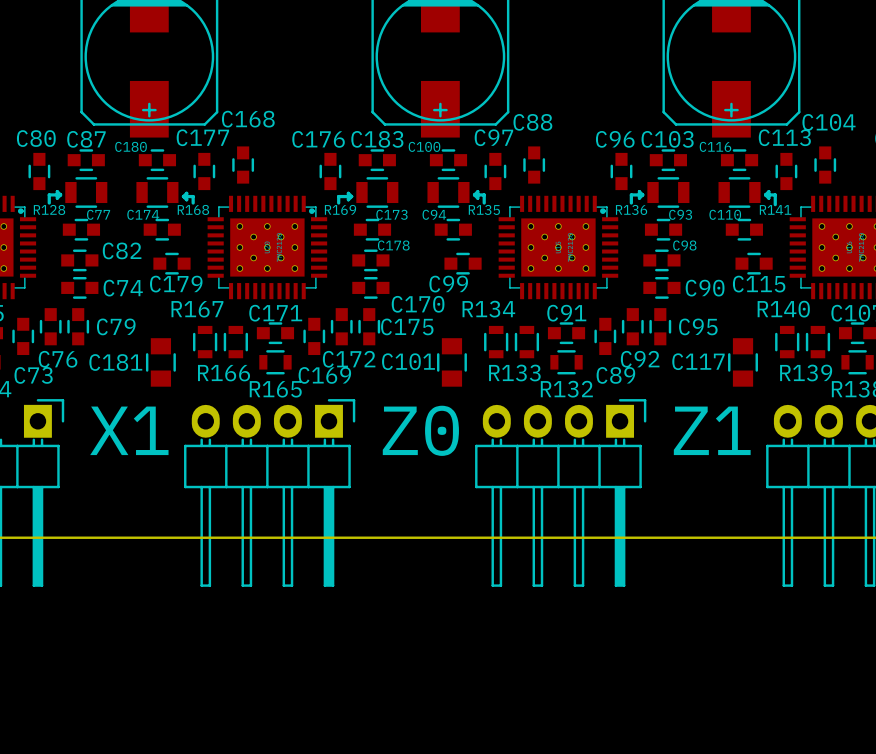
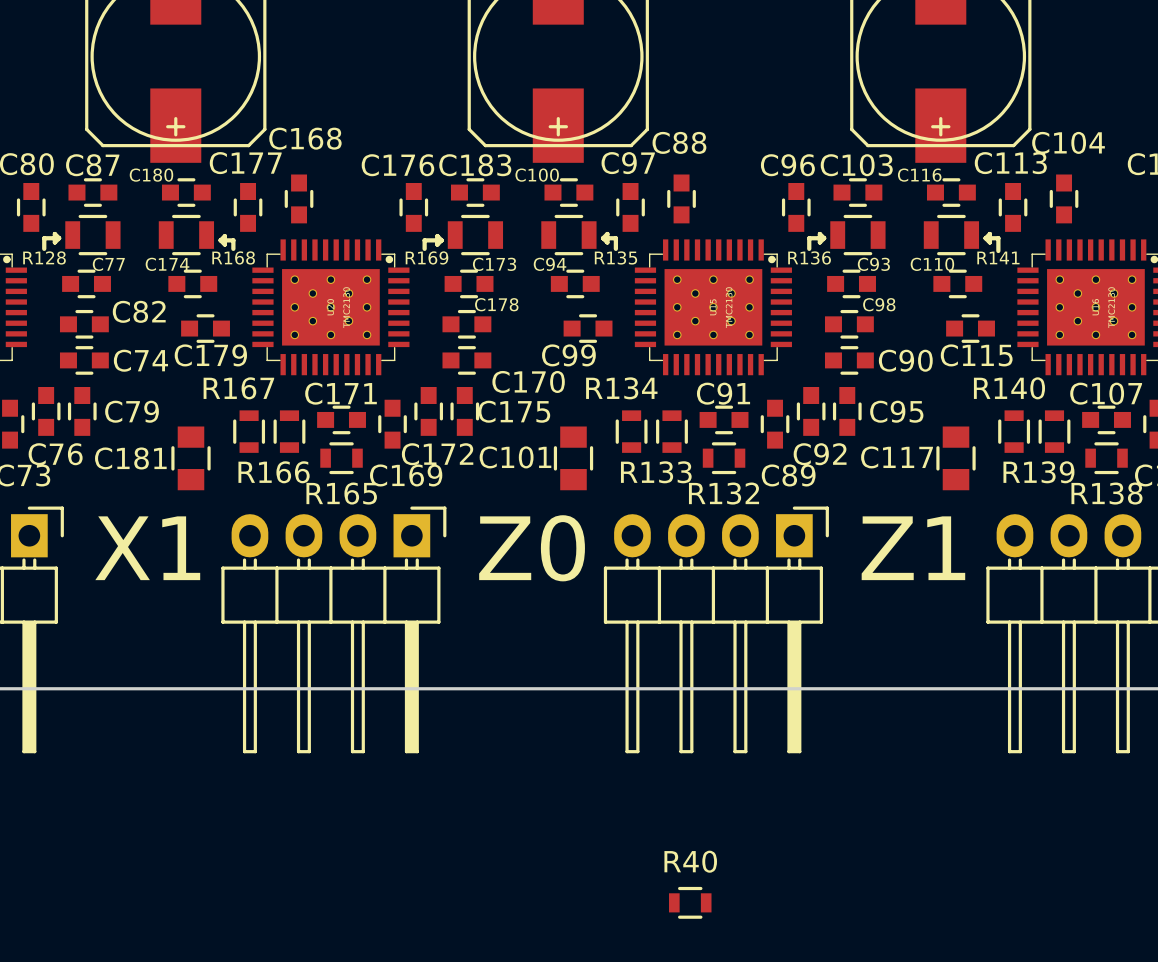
R40: none -> (690, 902)

